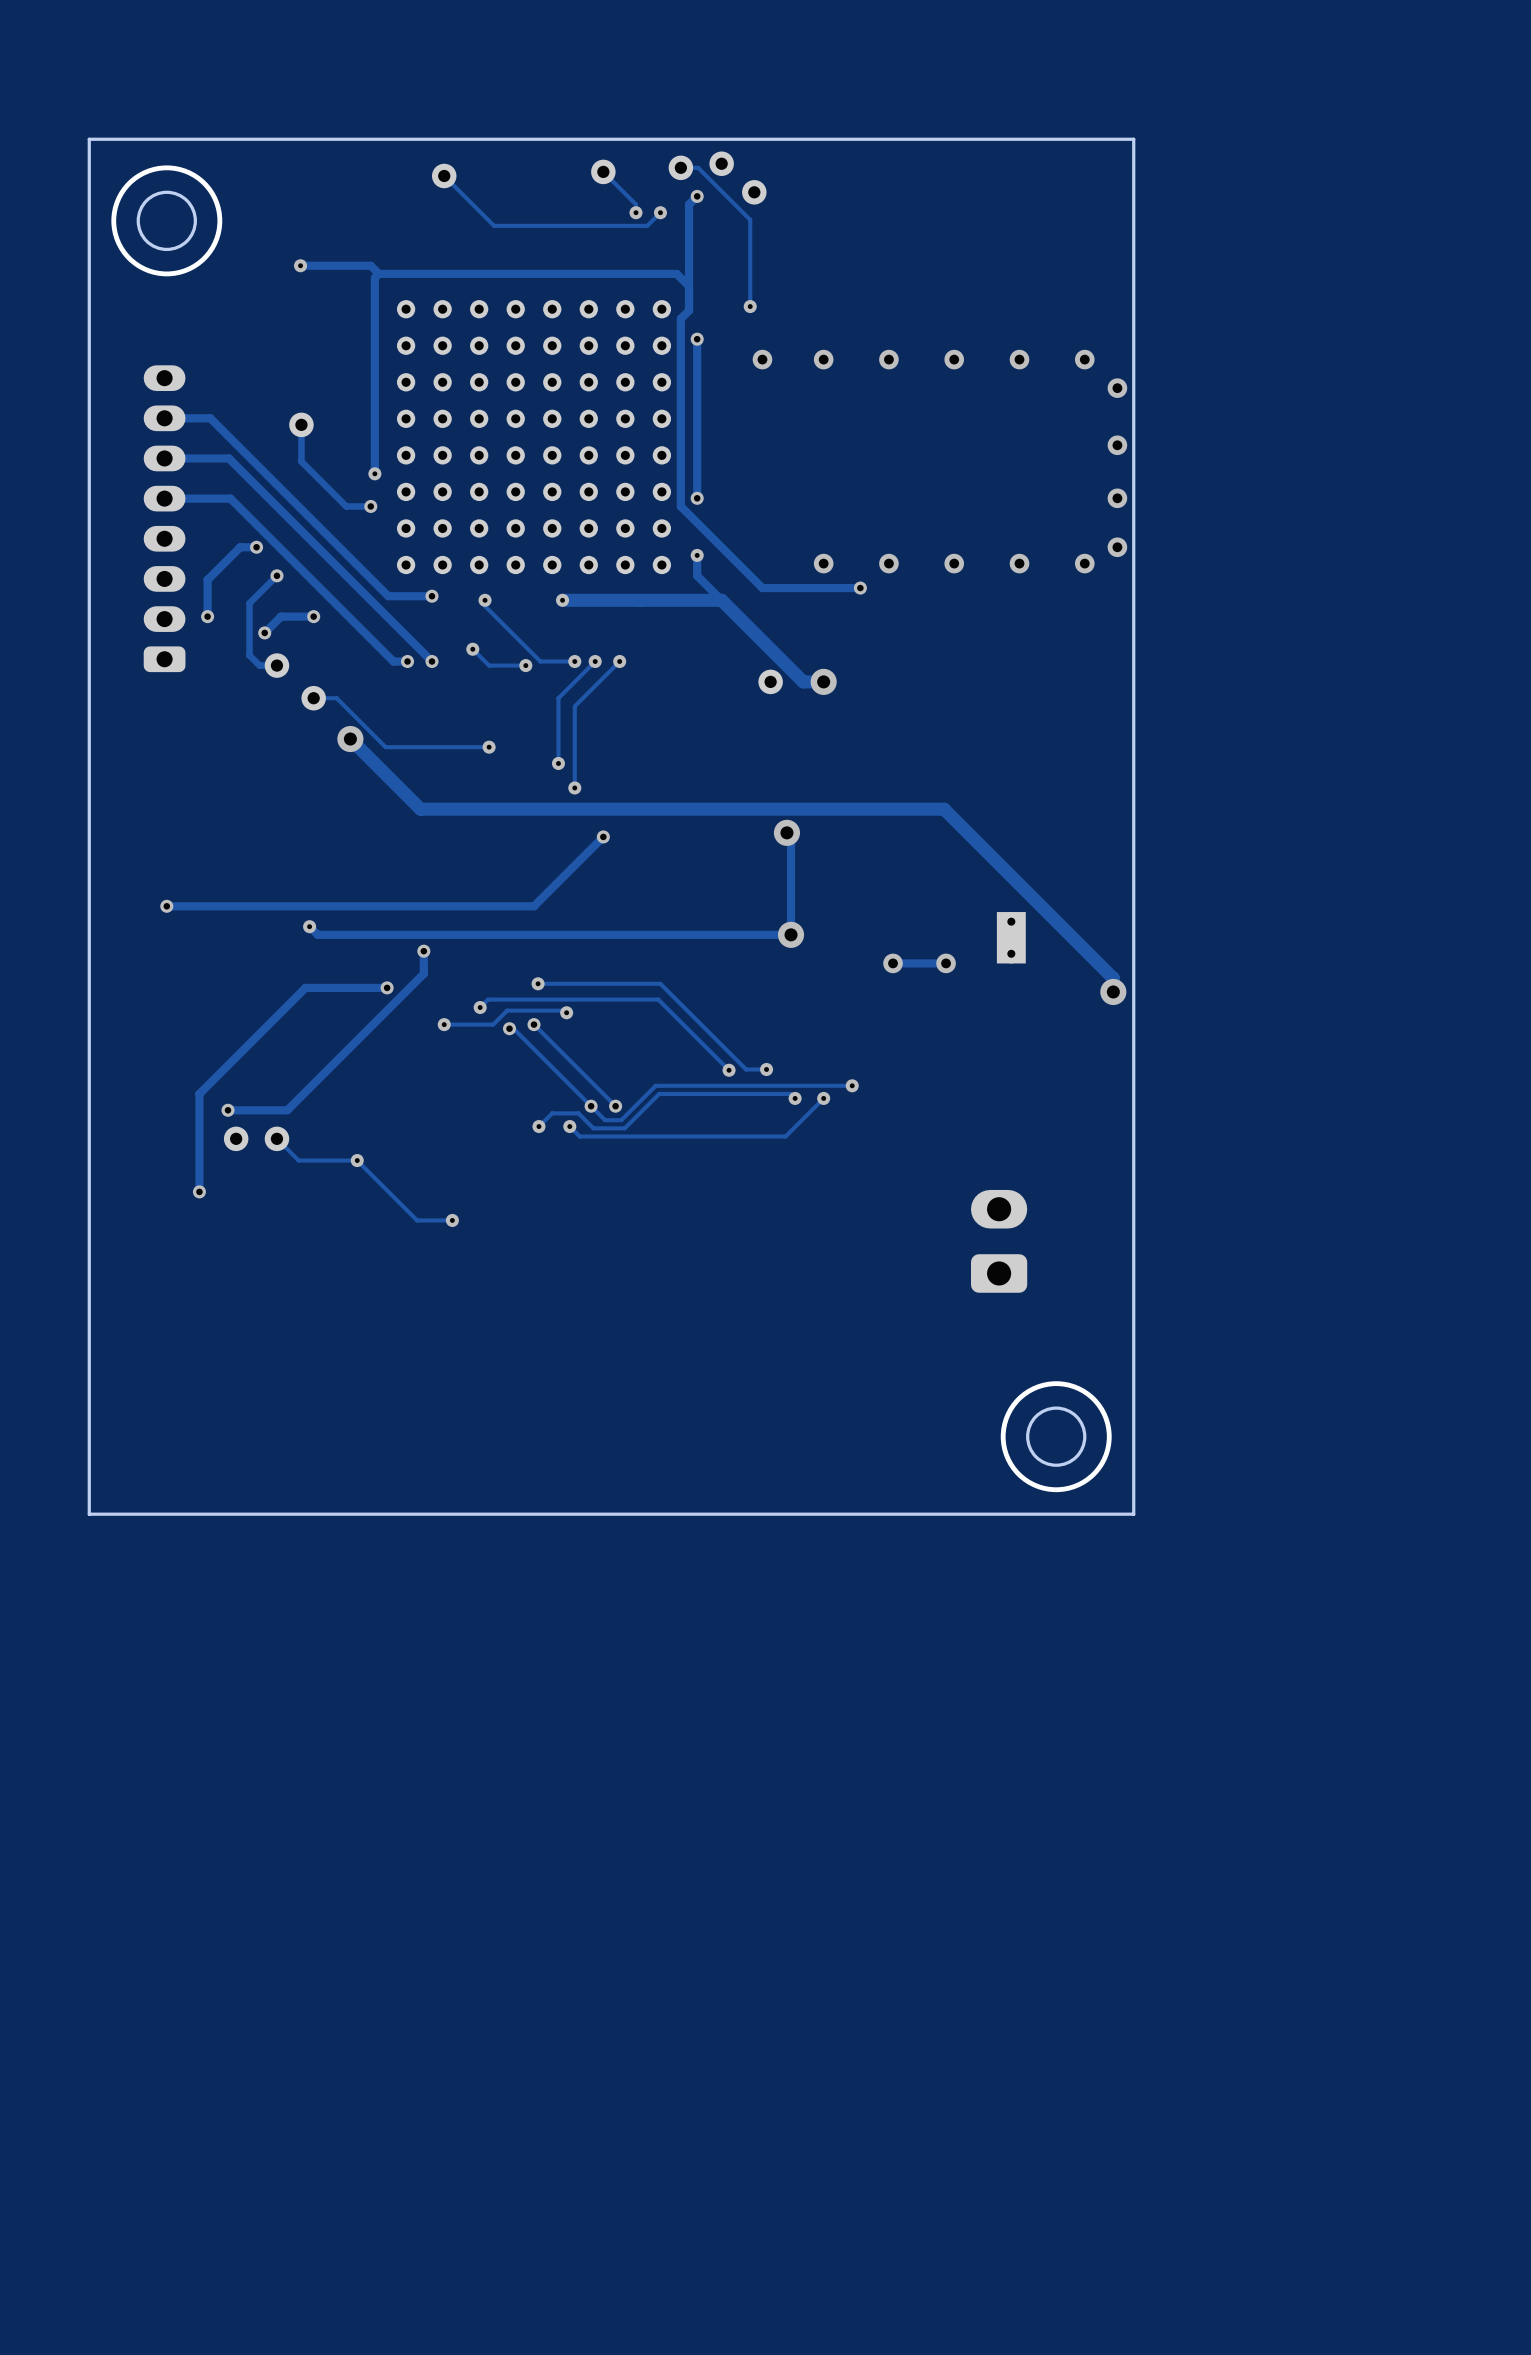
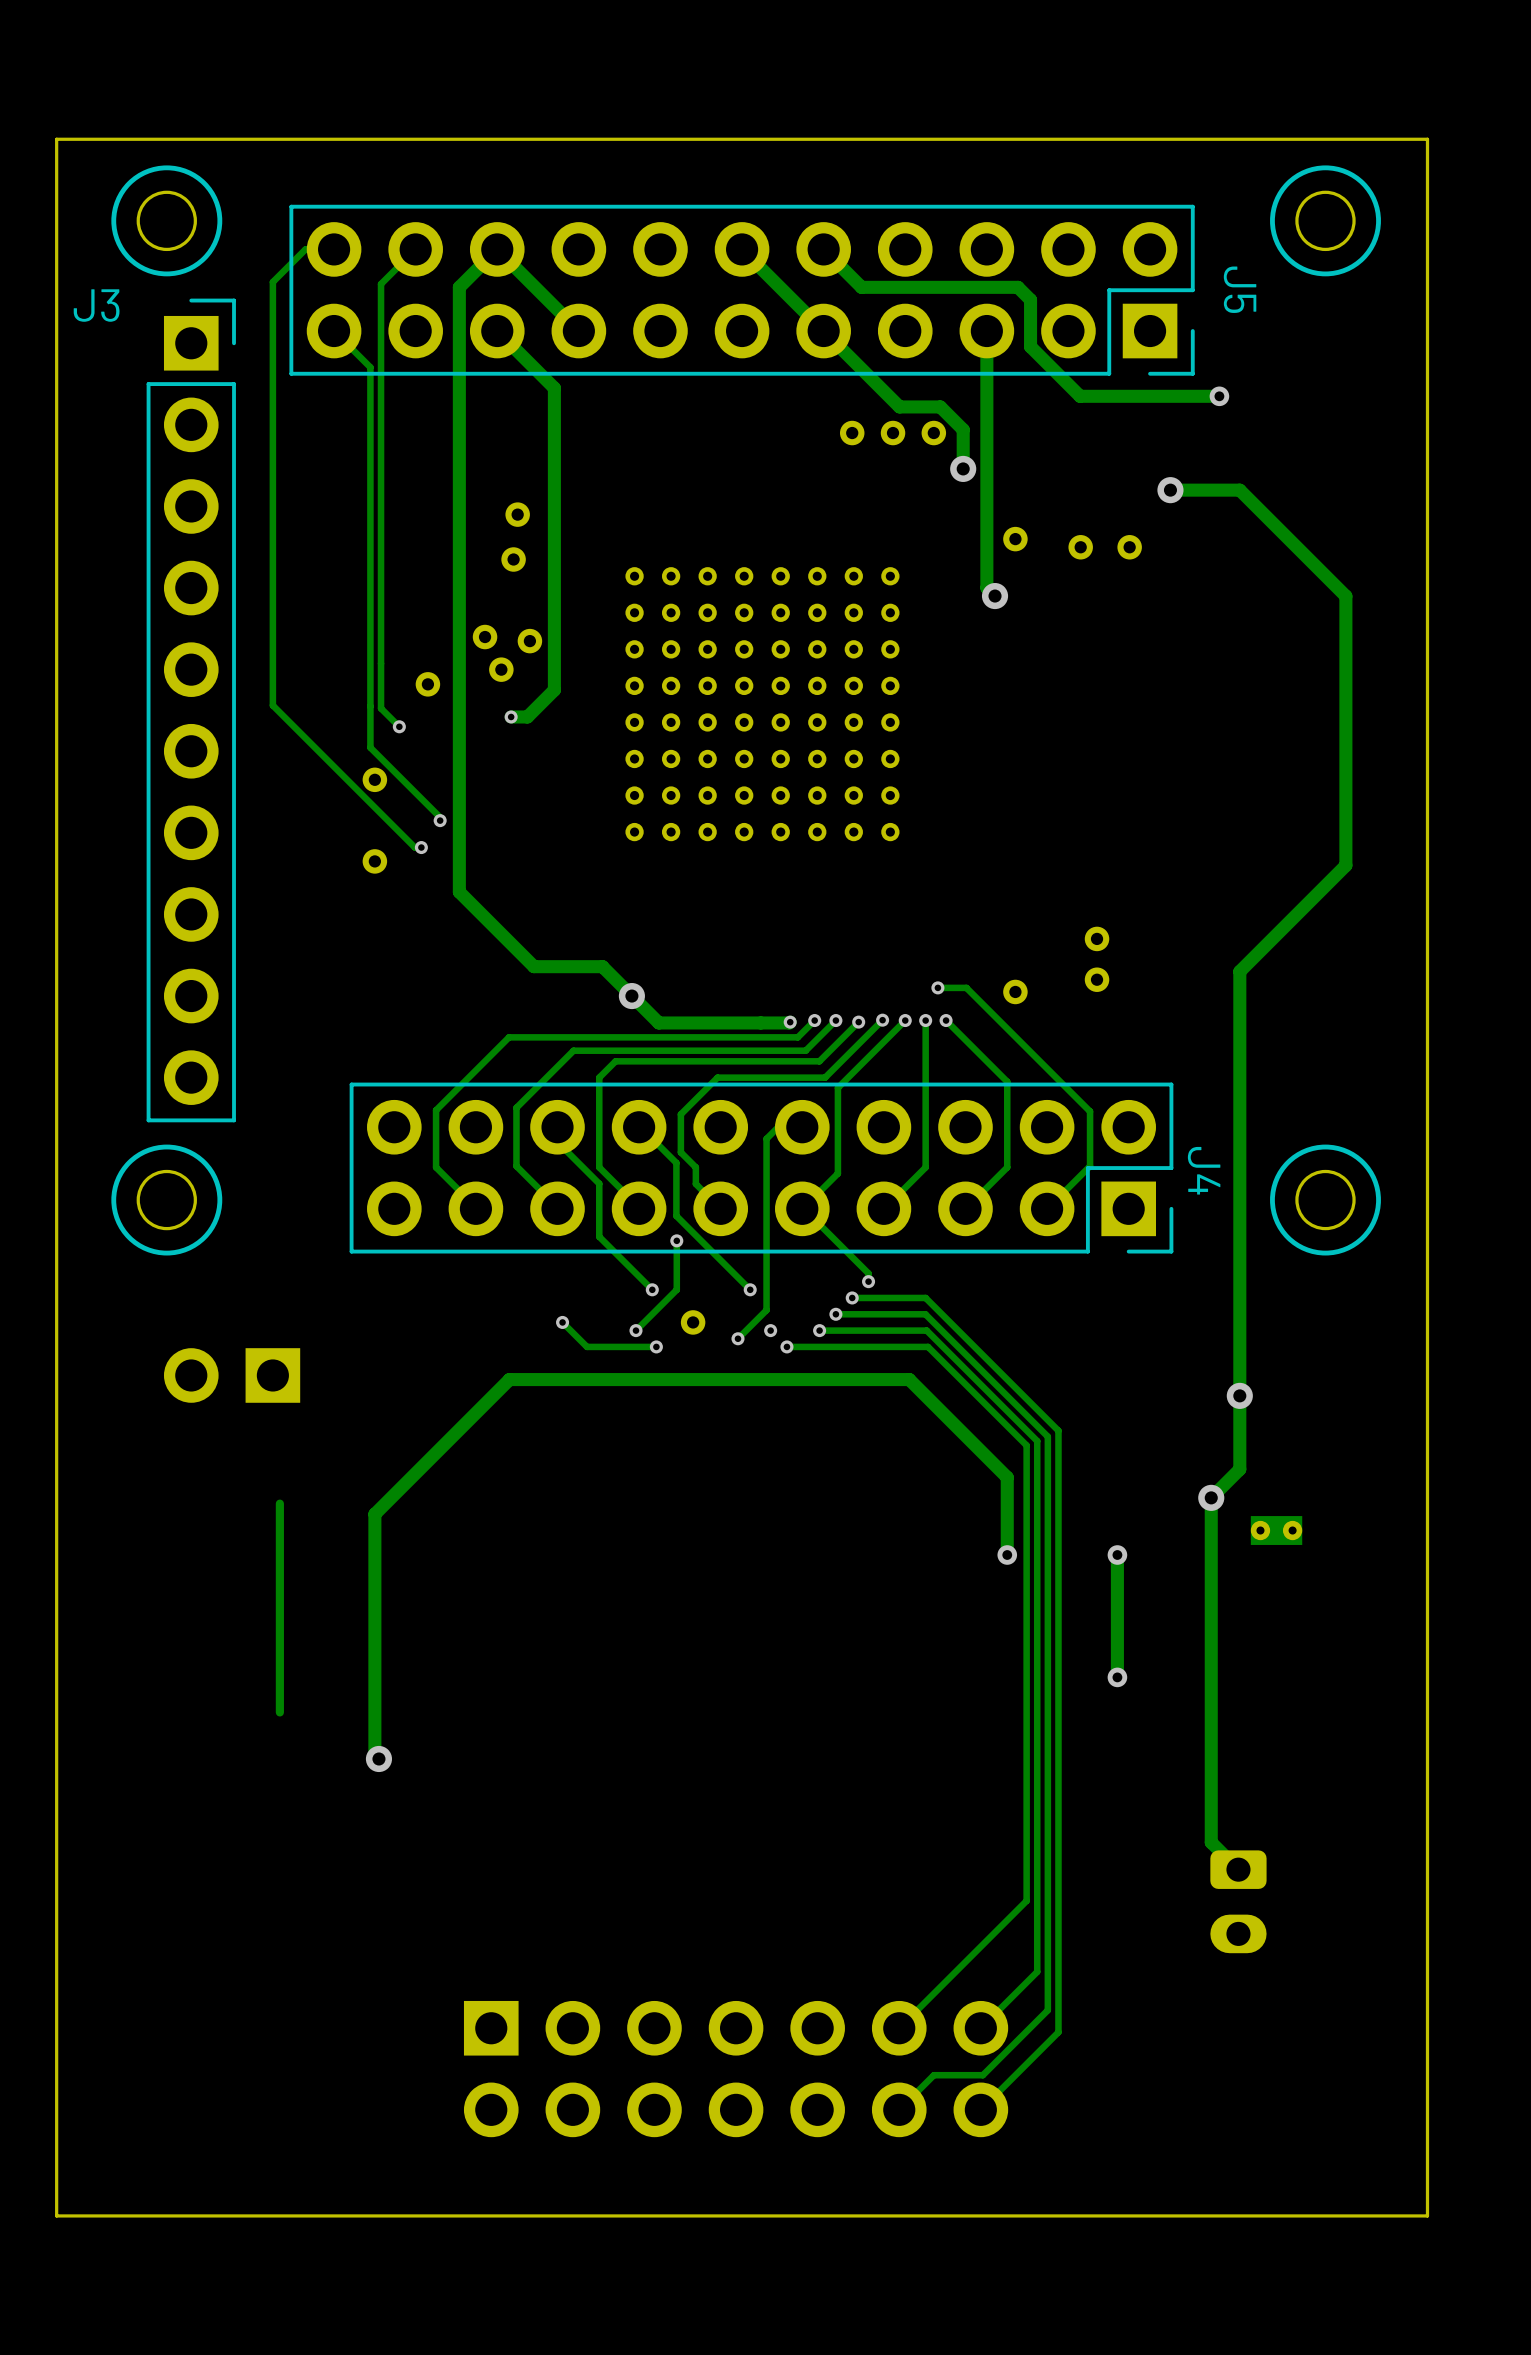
board edge: (1133, 139) (1133, 1514) (89, 1514) (89, 139) -> (1133, 139) (1427, 139) (1427, 2215) (56, 2215) (56, 139) (89, 139)
part: (721, 163) -> none
drawing: none -> [1270, 165, 1381, 277]
track: (680, 167) (698, 167) (750, 219) (750, 306) -> none
part: (680, 167) -> none
track: (603, 171) (635, 204) (635, 212) -> none
part: (603, 171) -> none
track: (444, 175) (494, 225) (647, 225) (660, 212) -> none
part: (444, 175) -> none
round board edge: none -> [1295, 190, 1356, 252]
part: (754, 192) -> none
track: (697, 196) (689, 204) (689, 310) (680, 318) (680, 506) (762, 588) (860, 588) -> none
via: (697, 196) -> none
via: (635, 212) -> none
via: (660, 212) -> none
track: none -> (334, 249) (305, 249) (272, 282) (272, 705) (414, 847) (421, 847)
track: none -> (415, 249) (381, 284) (381, 708) (399, 726)
track: none -> (742, 249) (899, 406) (940, 406) (963, 429) (963, 468)
track: none -> (823, 249) (861, 287) (1017, 287) (1030, 299) (1030, 346) (1080, 396) (1219, 396)
track: (300, 265) (370, 265) (378, 273) -> none
via: (300, 265) -> none
track: (378, 273) (676, 273) (689, 286) -> none
track: (378, 273) (374, 277) (374, 473) -> none
J5: none -> (742, 290)
via: (750, 306) -> none
track: none -> (334, 331) (370, 367) (370, 747) (440, 817) (440, 820)
track: none -> (497, 331) (554, 388) (554, 690) (527, 716) (511, 716)
track: none -> (578, 331) (497, 249) (459, 287) (459, 892) (533, 966) (602, 966) (658, 1022) (790, 1022)
track: none -> (986, 331) (986, 587) (995, 596)
track: (697, 339) (697, 498) -> none
via: (697, 339) -> none
via: (762, 359) -> none
via: (823, 359) -> none
via: (888, 359) -> none
via: (954, 359) -> none
via: (1019, 359) -> none
via: (1084, 359) -> none
via: (1117, 388) -> none
via: none -> (1219, 396)
track: (164, 418) (210, 418) (388, 596) (431, 596) -> none
track: (301, 424) (301, 461) (346, 506) (370, 506) -> none
part: (301, 424) -> none
part: none -> (852, 433)
part: none -> (893, 433)
part: none -> (933, 433)
part: (533, 437) -> none
via: (1117, 445) -> none
track: (164, 458) (228, 458) (431, 661) -> none
via: none -> (963, 468)
via: (374, 473) -> none
track: none -> (1170, 490) (1239, 490) (1345, 596) (1345, 865) (1239, 971) (1239, 1469) (1211, 1497) (1211, 1842) (1238, 1869)
via: none -> (1170, 490)
track: (164, 498) (230, 498) (393, 661) (407, 661) -> none
via: (697, 498) -> none
via: (1117, 498) -> none
via: (370, 506) -> none
part: none -> (517, 514)
part: (164, 518) -> none
part: none -> (1015, 539)
track: (256, 547) (240, 547) (207, 579) (207, 616) -> none
via: (256, 547) -> none
part: none -> (1080, 547)
via: (1117, 547) -> none
part: none -> (1129, 547)
track: (697, 555) (697, 575) (721, 600) -> none
via: (697, 555) -> none
part: none -> (513, 559)
via: (823, 563) -> none
via: (888, 563) -> none
via: (954, 563) -> none
via: (1019, 563) -> none
via: (1084, 563) -> none
track: (276, 575) (249, 603) (249, 655) (259, 665) (276, 665) -> none
via: (276, 575) -> none
via: (860, 588) -> none
via: (431, 596) -> none
via: none -> (995, 596)
track: (485, 600) (485, 606) (540, 661) (574, 661) -> none
via: (485, 600) -> none
via: (562, 600) -> none
track: (721, 600) (562, 600) -> none
track: (721, 600) (803, 681) (823, 681) -> none
via: (207, 616) -> none
track: (313, 616) (281, 616) (264, 632) -> none
via: (313, 616) -> none
via: (264, 632) -> none
part: none -> (485, 637)
part: none -> (529, 641)
track: (472, 649) (489, 665) (525, 665) -> none
via: (472, 649) -> none
via: (407, 661) -> none
via: (431, 661) -> none
via: (574, 661) -> none
track: (595, 661) (558, 698) (558, 763) -> none
via: (595, 661) -> none
track: (619, 661) (574, 706) (574, 787) -> none
via: (619, 661) -> none
part: (276, 665) -> none
via: (525, 665) -> none
part: none -> (501, 669)
part footprint: [758, 669, 783, 695] -> [625, 567, 900, 842]
via: (823, 681) -> none
part: none -> (427, 684)
track: (313, 698) (336, 698) (385, 747) (489, 747) -> none
part: (313, 698) -> none
J3: none -> (191, 710)
via: none -> (511, 716)
via: none -> (399, 726)
track: (350, 739) (420, 809) (944, 809) (1113, 978) (1113, 991) -> none
via: (350, 739) -> none
via: (489, 747) -> none
via: (558, 763) -> none
part: none -> (374, 779)
via: (574, 787) -> none
via: none -> (440, 820)
track: (786, 832) (791, 836) (791, 934) (317, 934) (309, 926) -> none
via: (786, 832) -> none
track: (603, 836) (533, 906) (166, 906) -> none
via: (603, 836) -> none
via: none -> (421, 847)
part: none -> (374, 861)
via: (166, 906) -> none
via: (309, 926) -> none
via: (791, 934) -> none
part rotation: 0° (1011, 937) -> 90° clockwise (1276, 1530)
part position: (1011, 937) -> (1276, 1530)
part: none -> (1097, 938)
track: (423, 951) (423, 973) (287, 1110) (228, 1110) -> none
via: (423, 951) -> none
via: (893, 963) -> none
track: (946, 963) (893, 963) -> none
via: (946, 963) -> none
part: none -> (1097, 979)
track: (538, 983) (660, 983) (746, 1069) (766, 1069) -> none
via: (538, 983) -> none
track: (387, 987) (305, 987) (199, 1093) (199, 1191) -> none
via: (387, 987) -> none
track: none -> (937, 987) (966, 987) (1090, 1111) (1090, 1166) (1048, 1208)
via: none -> (937, 987)
part: none -> (1015, 991)
via: (1113, 991) -> none
via: none -> (631, 996)
track: (480, 1007) (488, 999) (658, 999) (729, 1070) -> none
via: (480, 1007) -> none
track: (566, 1012) (564, 1010) (507, 1010) (493, 1024) (444, 1024) -> none
via: (566, 1012) -> none
track: none -> (814, 1020) (797, 1037) (509, 1037) (436, 1110) (436, 1167) (476, 1208)
via: none -> (814, 1020)
track: none -> (835, 1020) (805, 1050) (573, 1050) (516, 1107) (516, 1166) (558, 1208)
via: none -> (835, 1020)
track: none -> (882, 1020) (825, 1077) (717, 1077) (680, 1114) (680, 1152) (695, 1167) (695, 1184) (720, 1208)
via: none -> (882, 1020)
track: none -> (905, 1020) (837, 1087) (837, 1173) (803, 1208) (868, 1273) (868, 1281)
via: none -> (905, 1020)
track: none -> (925, 1020) (925, 1167) (884, 1208)
via: none -> (925, 1020)
track: none -> (946, 1020) (1007, 1081) (1007, 1167) (966, 1208)
via: none -> (946, 1020)
via: none -> (790, 1022)
track: none -> (858, 1022) (819, 1061) (615, 1061) (599, 1077) (599, 1167) (640, 1208)
via: none -> (858, 1022)
via: (444, 1024) -> none
track: (533, 1024) (615, 1106) -> none
via: (533, 1024) -> none
track: (509, 1028) (513, 1028) (605, 1120) (621, 1120) (655, 1085) (852, 1085) -> none
via: (509, 1028) -> none
via: (766, 1069) -> none
via: (729, 1070) -> none
via: (852, 1085) -> none
track: (795, 1098) (790, 1093) (659, 1093) (624, 1128) (593, 1128) (578, 1113) (552, 1113) (538, 1126) -> none
via: (795, 1098) -> none
track: (823, 1098) (785, 1136) (579, 1136) (569, 1126) -> none
via: (823, 1098) -> none
via: (591, 1106) -> none
via: (615, 1106) -> none
via: (228, 1110) -> none
via: (538, 1126) -> none
track: none -> (558, 1126) (558, 1142) (599, 1183) (599, 1236) (652, 1289)
via: (569, 1126) -> none
track: none -> (640, 1126) (676, 1162) (676, 1215) (750, 1289)
track: none -> (803, 1126) (778, 1126) (766, 1138) (766, 1310) (737, 1338)
part: (236, 1138) -> none
track: (276, 1138) (298, 1160) (357, 1160) (417, 1220) (452, 1220) -> none
part: (276, 1138) -> none
drawing: none -> [111, 1144, 223, 1256]
via: (357, 1160) -> none
J4: none -> (761, 1168)
round board edge: none -> [136, 1169, 197, 1231]
via: (199, 1191) -> none
via: (452, 1220) -> none
track: none -> (676, 1240) (676, 1289) (635, 1330)
via: none -> (676, 1240)
part rotation: 0° (999, 1241) -> 180° (1238, 1901)
part position: (999, 1241) -> (1238, 1901)
via: none -> (868, 1281)
via: none -> (652, 1289)
via: none -> (750, 1289)
track: none -> (852, 1297) (925, 1297) (1058, 1430) (1058, 2032) (980, 2109)
via: none -> (852, 1297)
track: none -> (835, 1314) (925, 1314) (1047, 1436) (1047, 2010) (982, 2075) (933, 2075) (899, 2109)
via: none -> (835, 1314)
track: none -> (562, 1322) (587, 1346) (656, 1346)
via: none -> (562, 1322)
part: none -> (693, 1322)
via: none -> (635, 1330)
via: none -> (770, 1330)
track: none -> (819, 1330) (926, 1330) (1037, 1441) (1037, 1971) (980, 2028)
via: none -> (819, 1330)
via: none -> (737, 1338)
via: none -> (656, 1346)
track: none -> (786, 1346) (928, 1346) (1026, 1445) (1026, 1900) (899, 2028)
via: none -> (786, 1346)
part: none -> (232, 1375)
via: none -> (1239, 1395)
drawing position: (1056, 1436) -> (1325, 1200)
round board edge position: (1056, 1436) -> (1325, 1200)
via: none -> (1211, 1497)
track: none -> (279, 1503) (279, 1712)
track: none -> (1007, 1554) (1007, 1477) (909, 1379) (509, 1379) (374, 1514) (374, 1754) (378, 1758)
via: none -> (1007, 1554)
track: none -> (1117, 1554) (1117, 1677)
via: none -> (1117, 1554)
via: none -> (1117, 1677)
via: none -> (378, 1758)
part: none -> (736, 2069)

